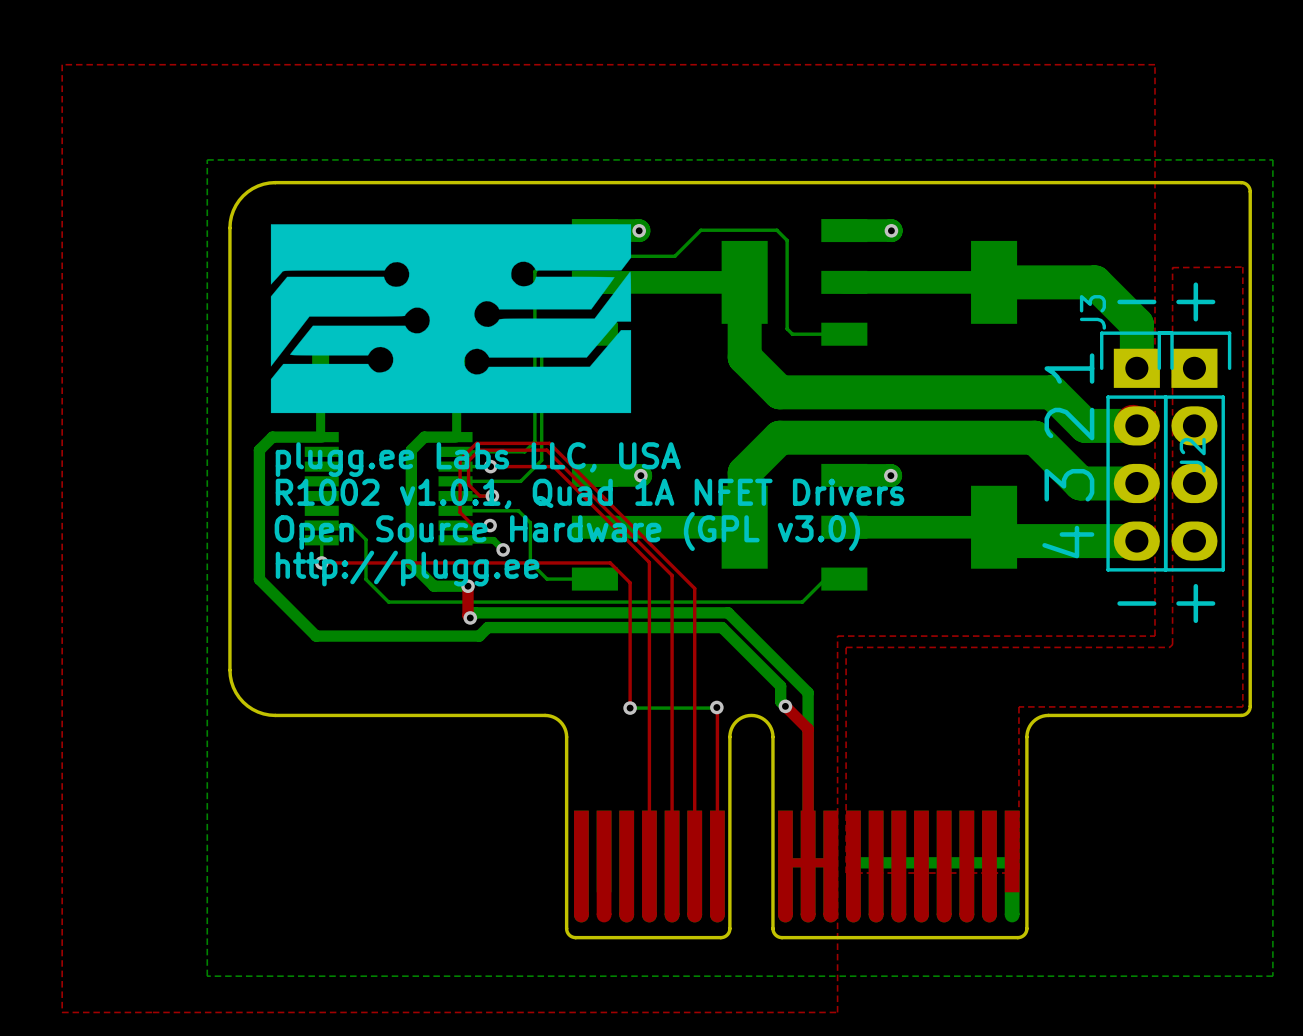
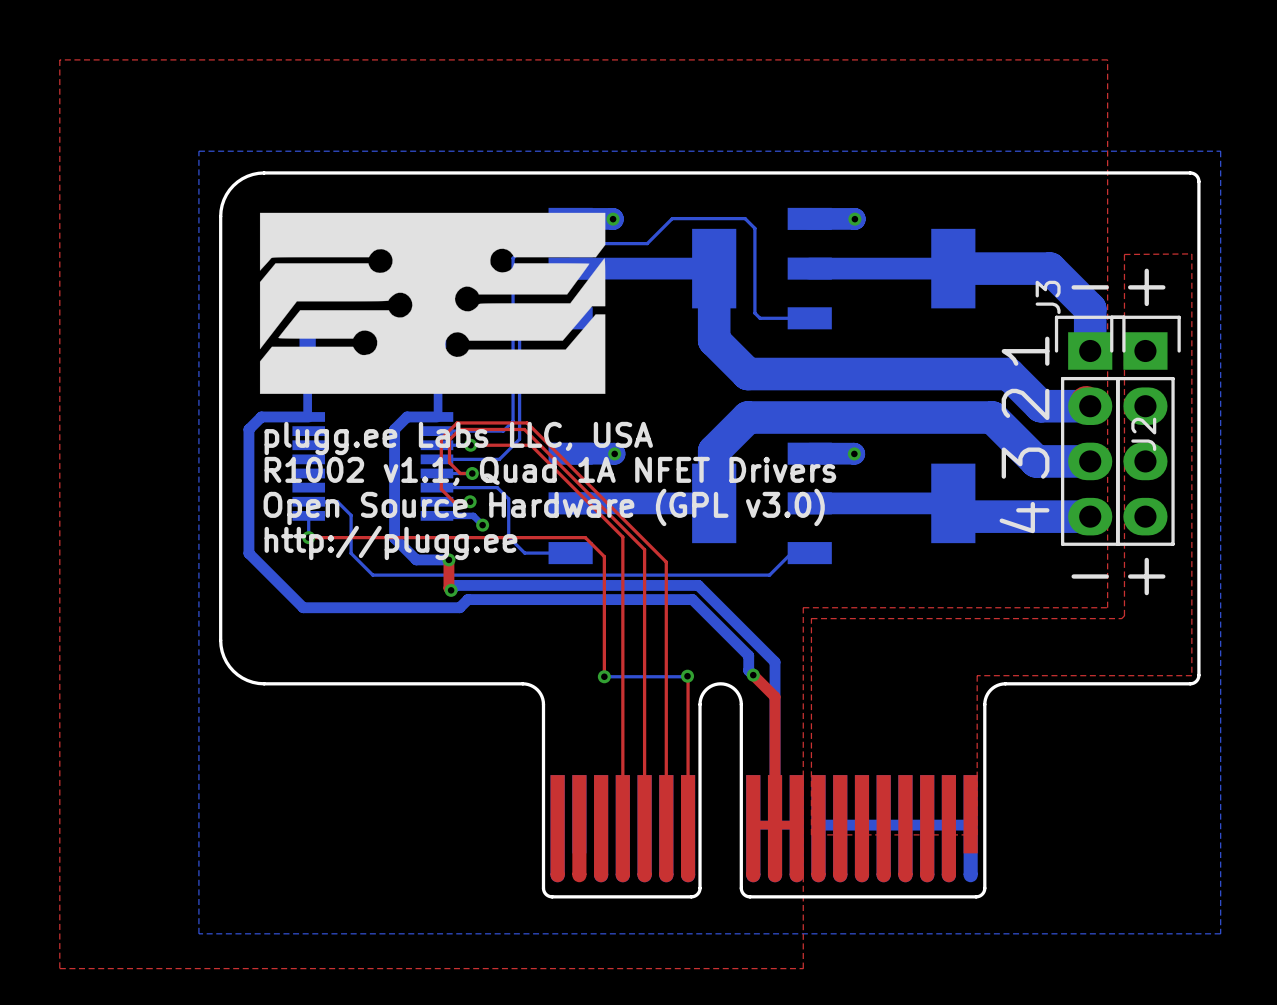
text: R1002 v1.0.1, Quad 1A NFET Drivers (590, 493) -> R1002 v1.1, Quad 1A NFET Drivers (550, 471)

